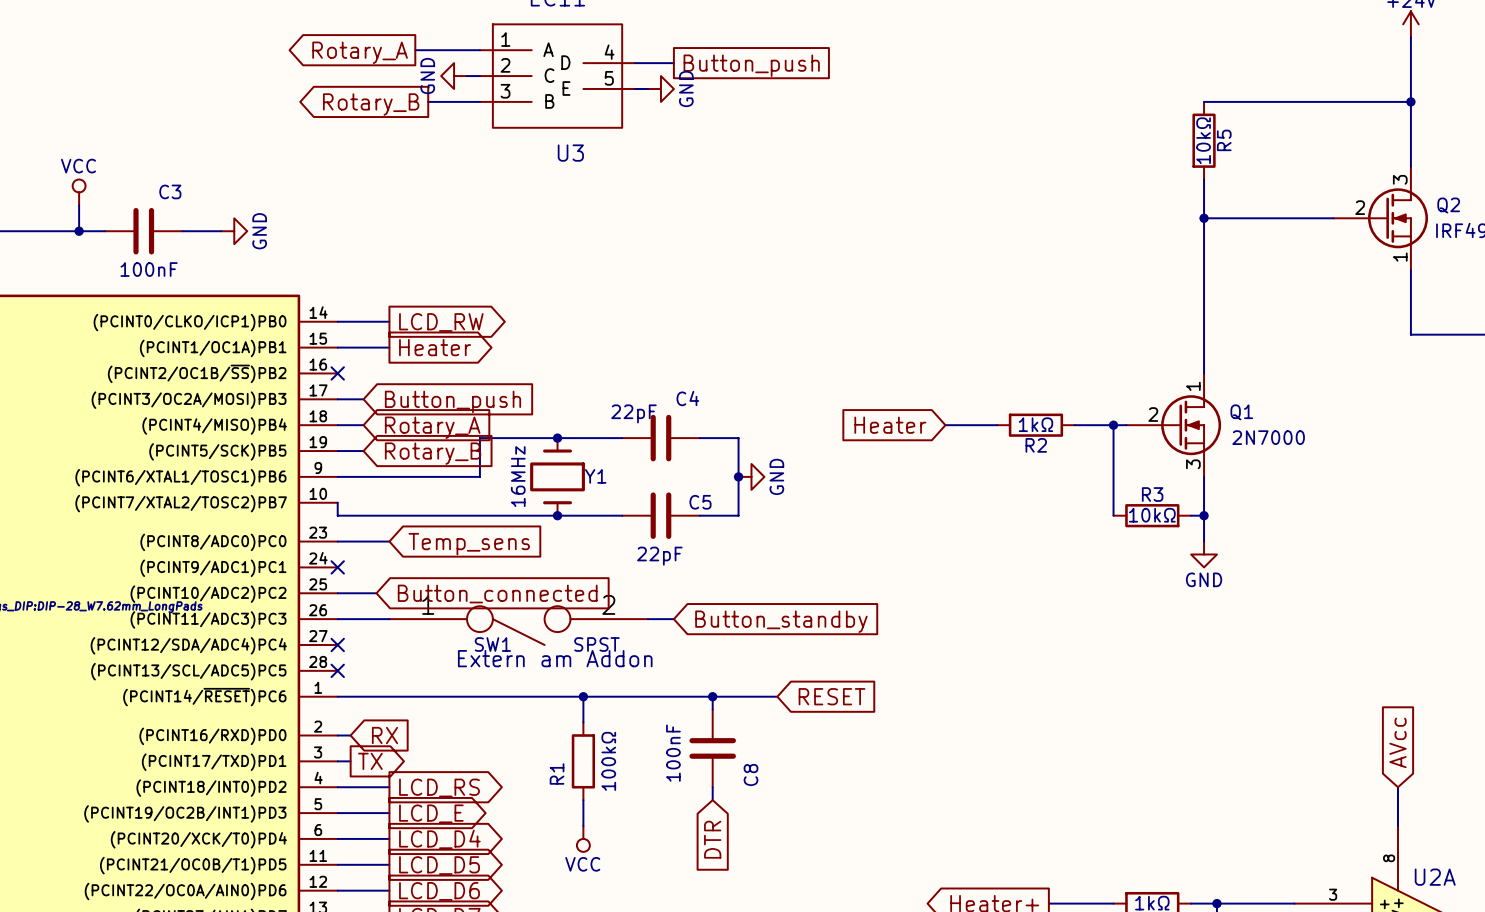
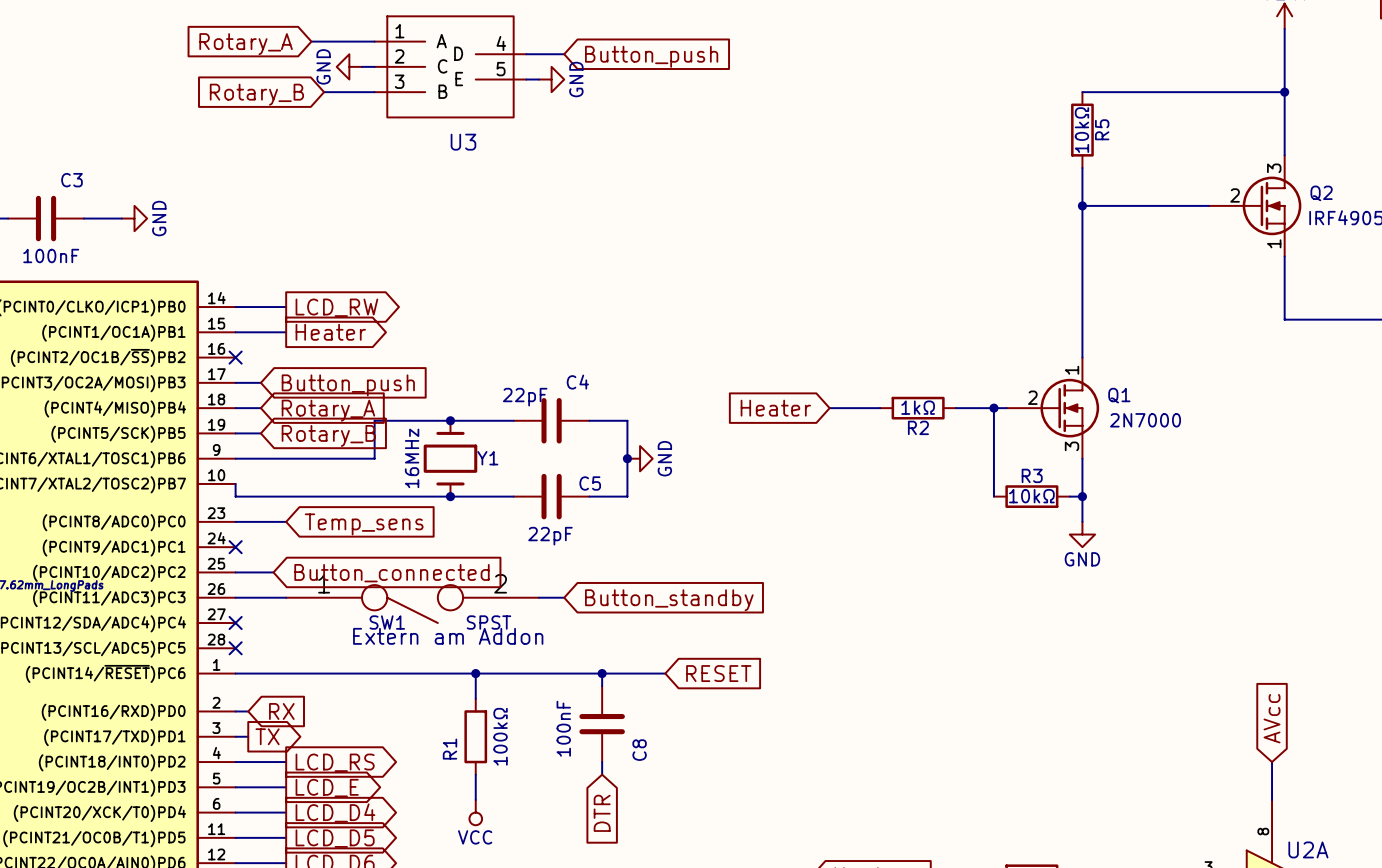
global label shape: output (360, 52) -> input (246, 44)
global label shape: passive (751, 65) -> input (651, 56)
global label shape: output (371, 104) -> input (256, 94)

